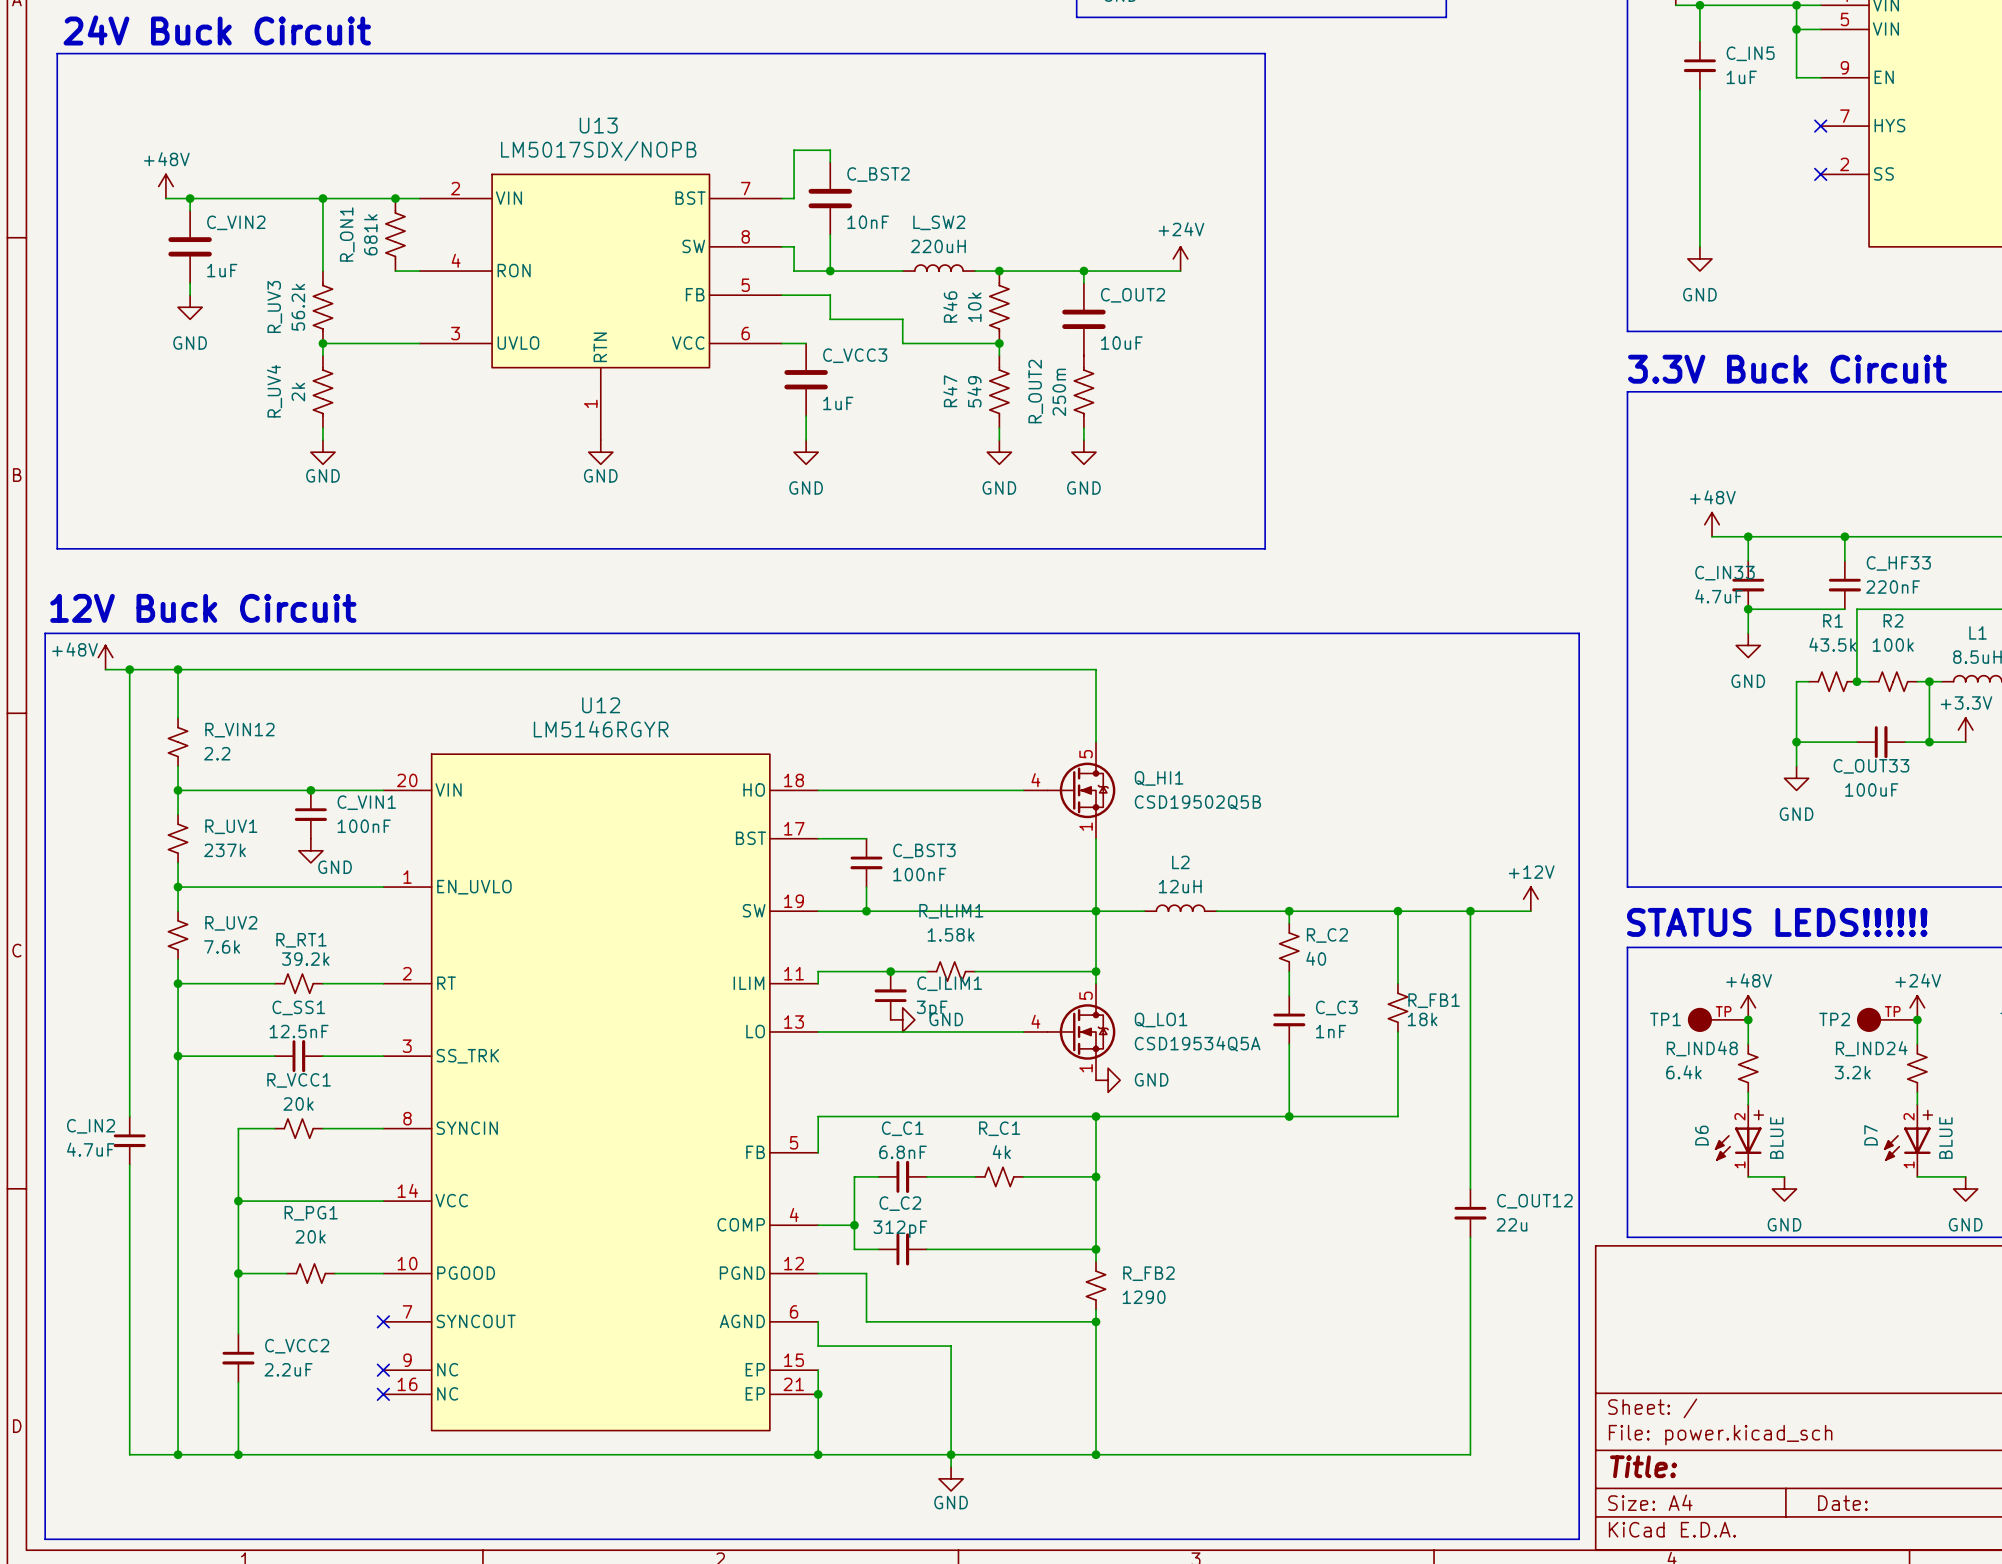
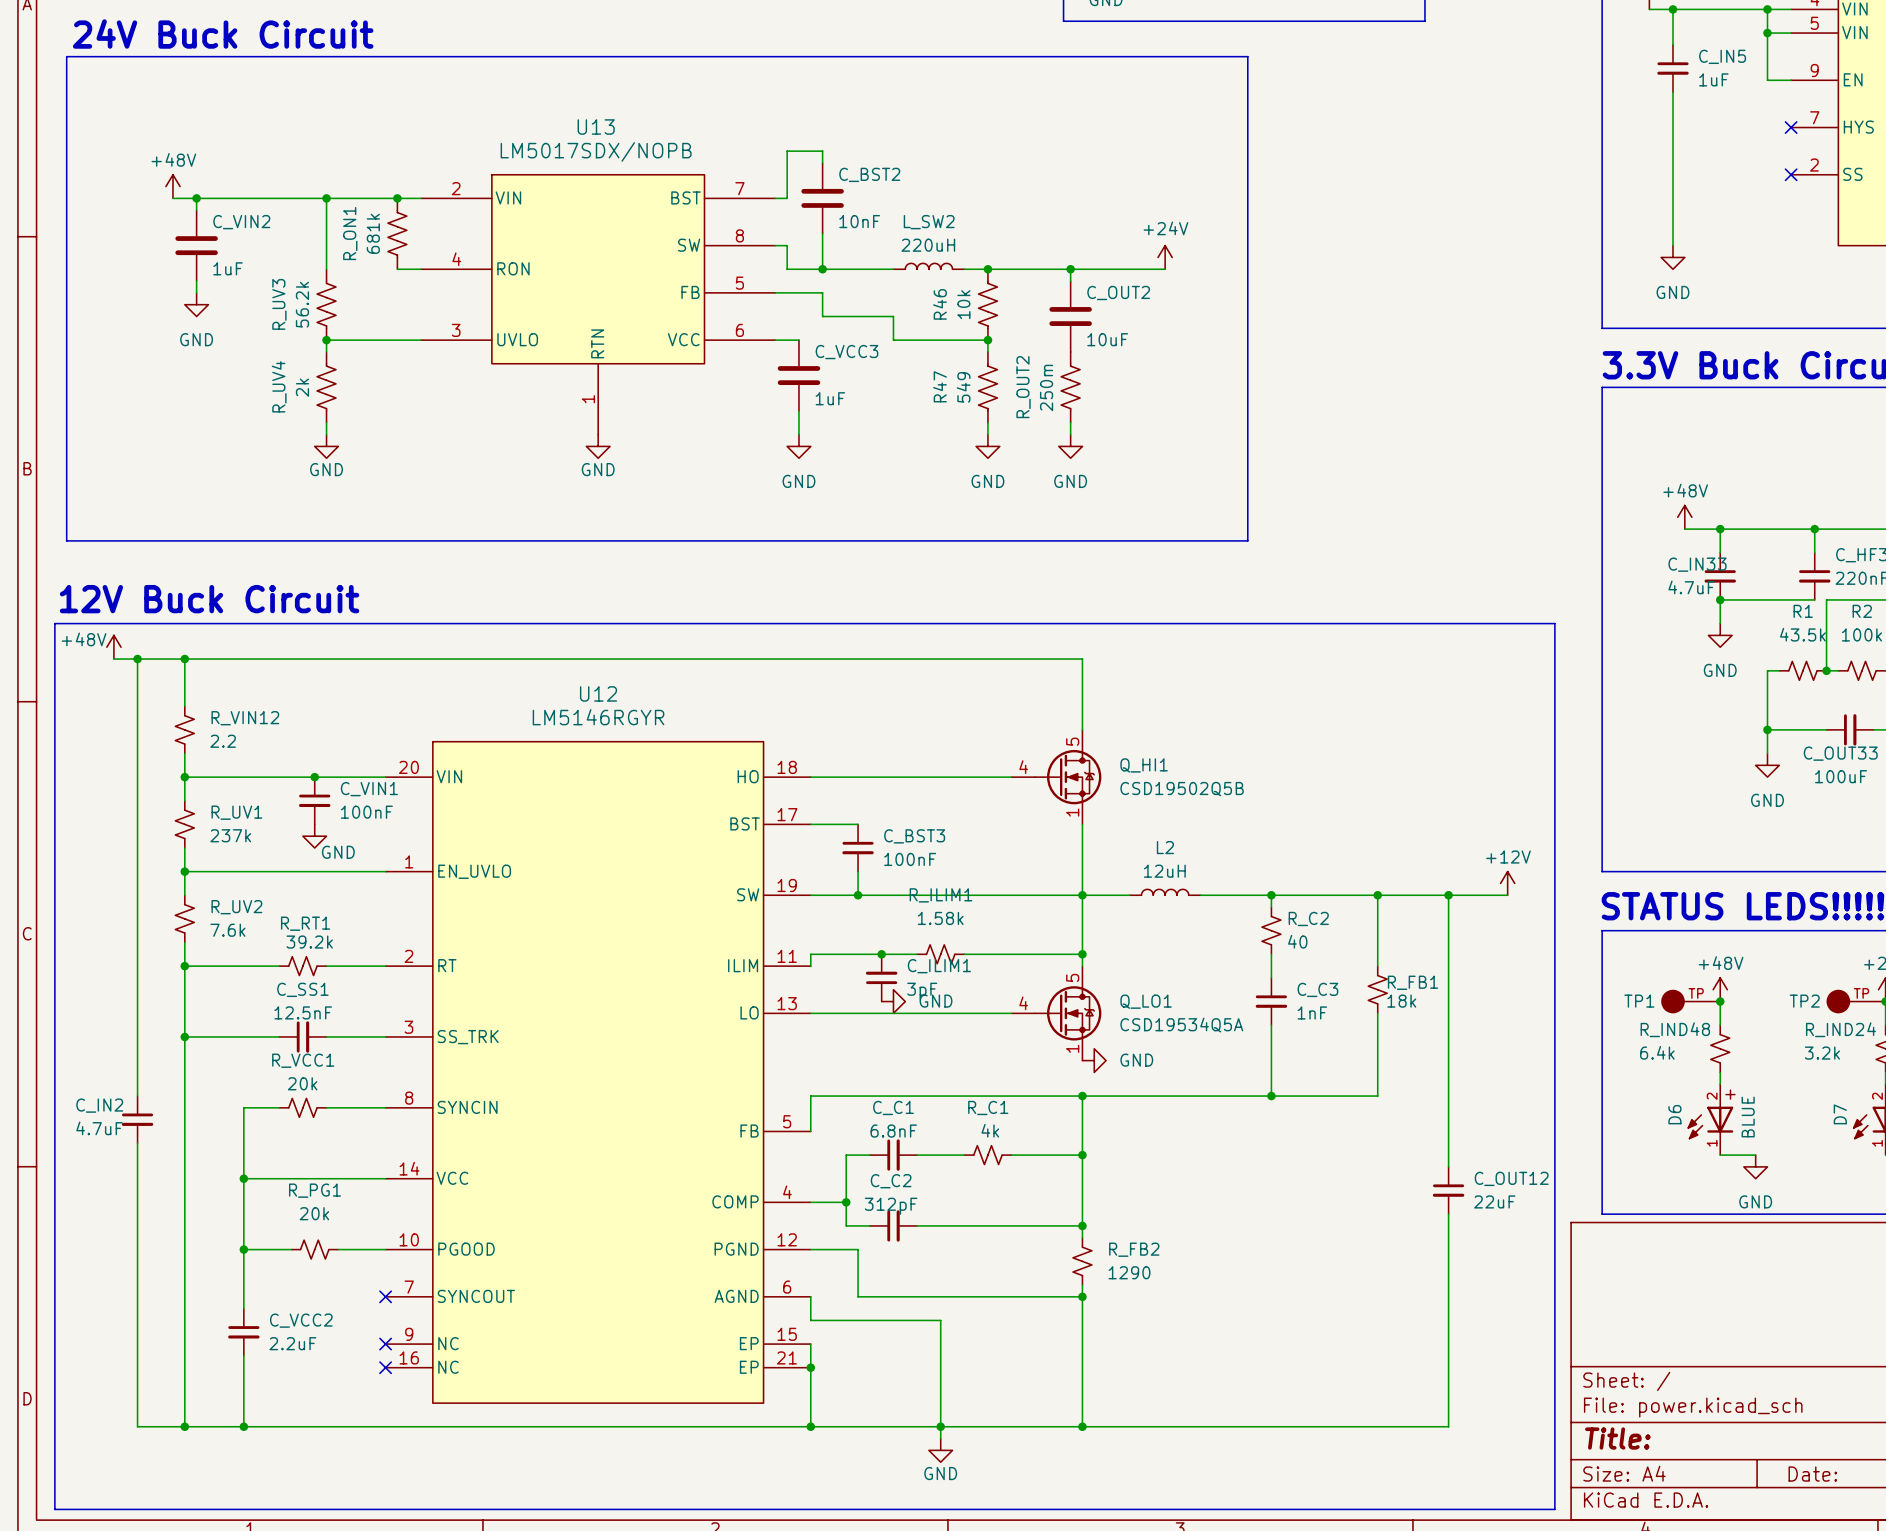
C_OUT12 value: 22u (1511, 1224) -> 22uF (1494, 1201)

